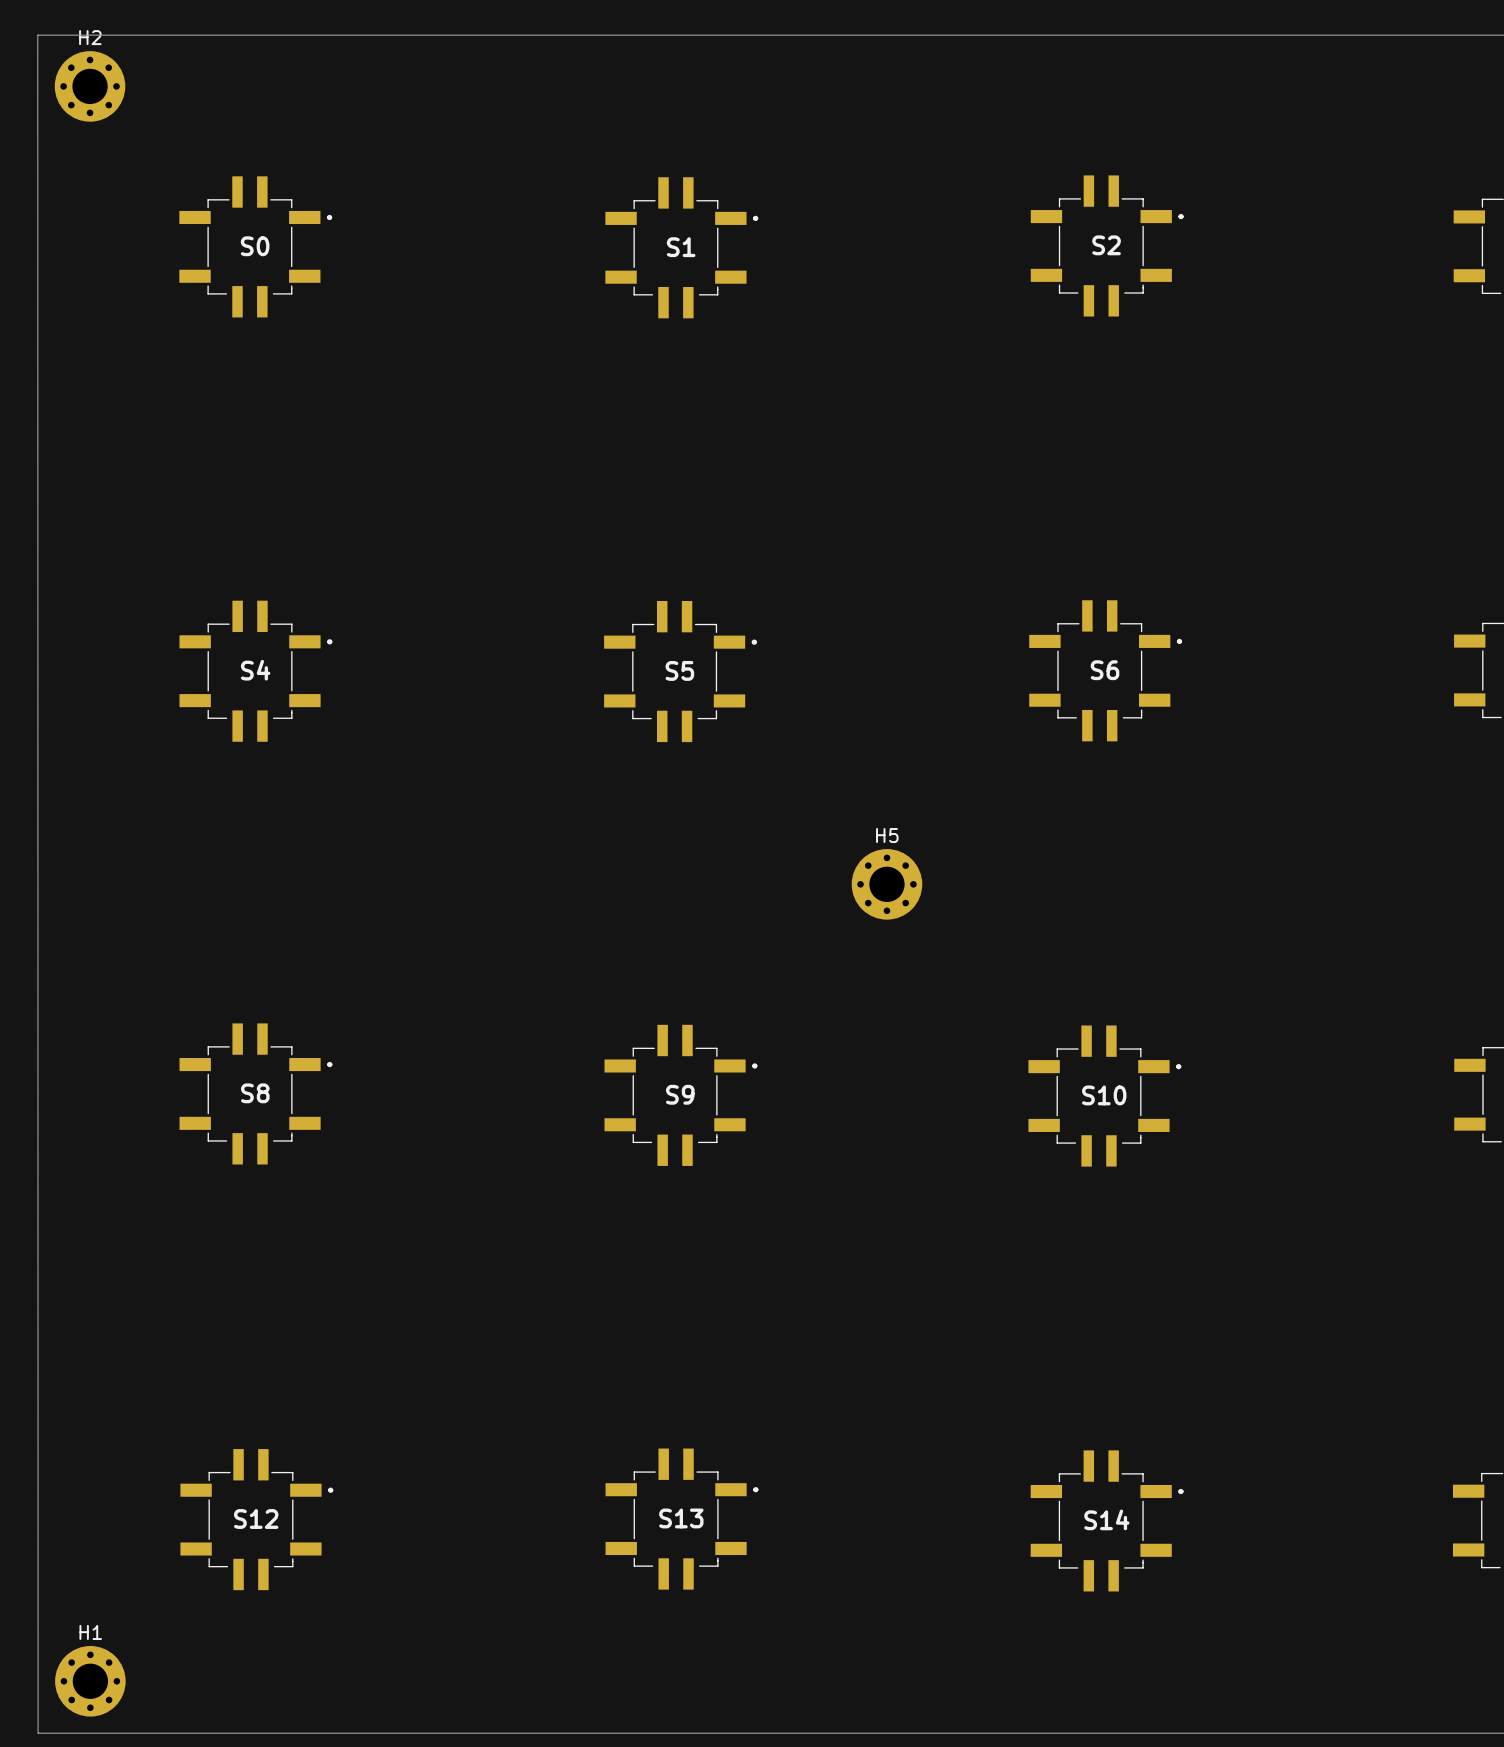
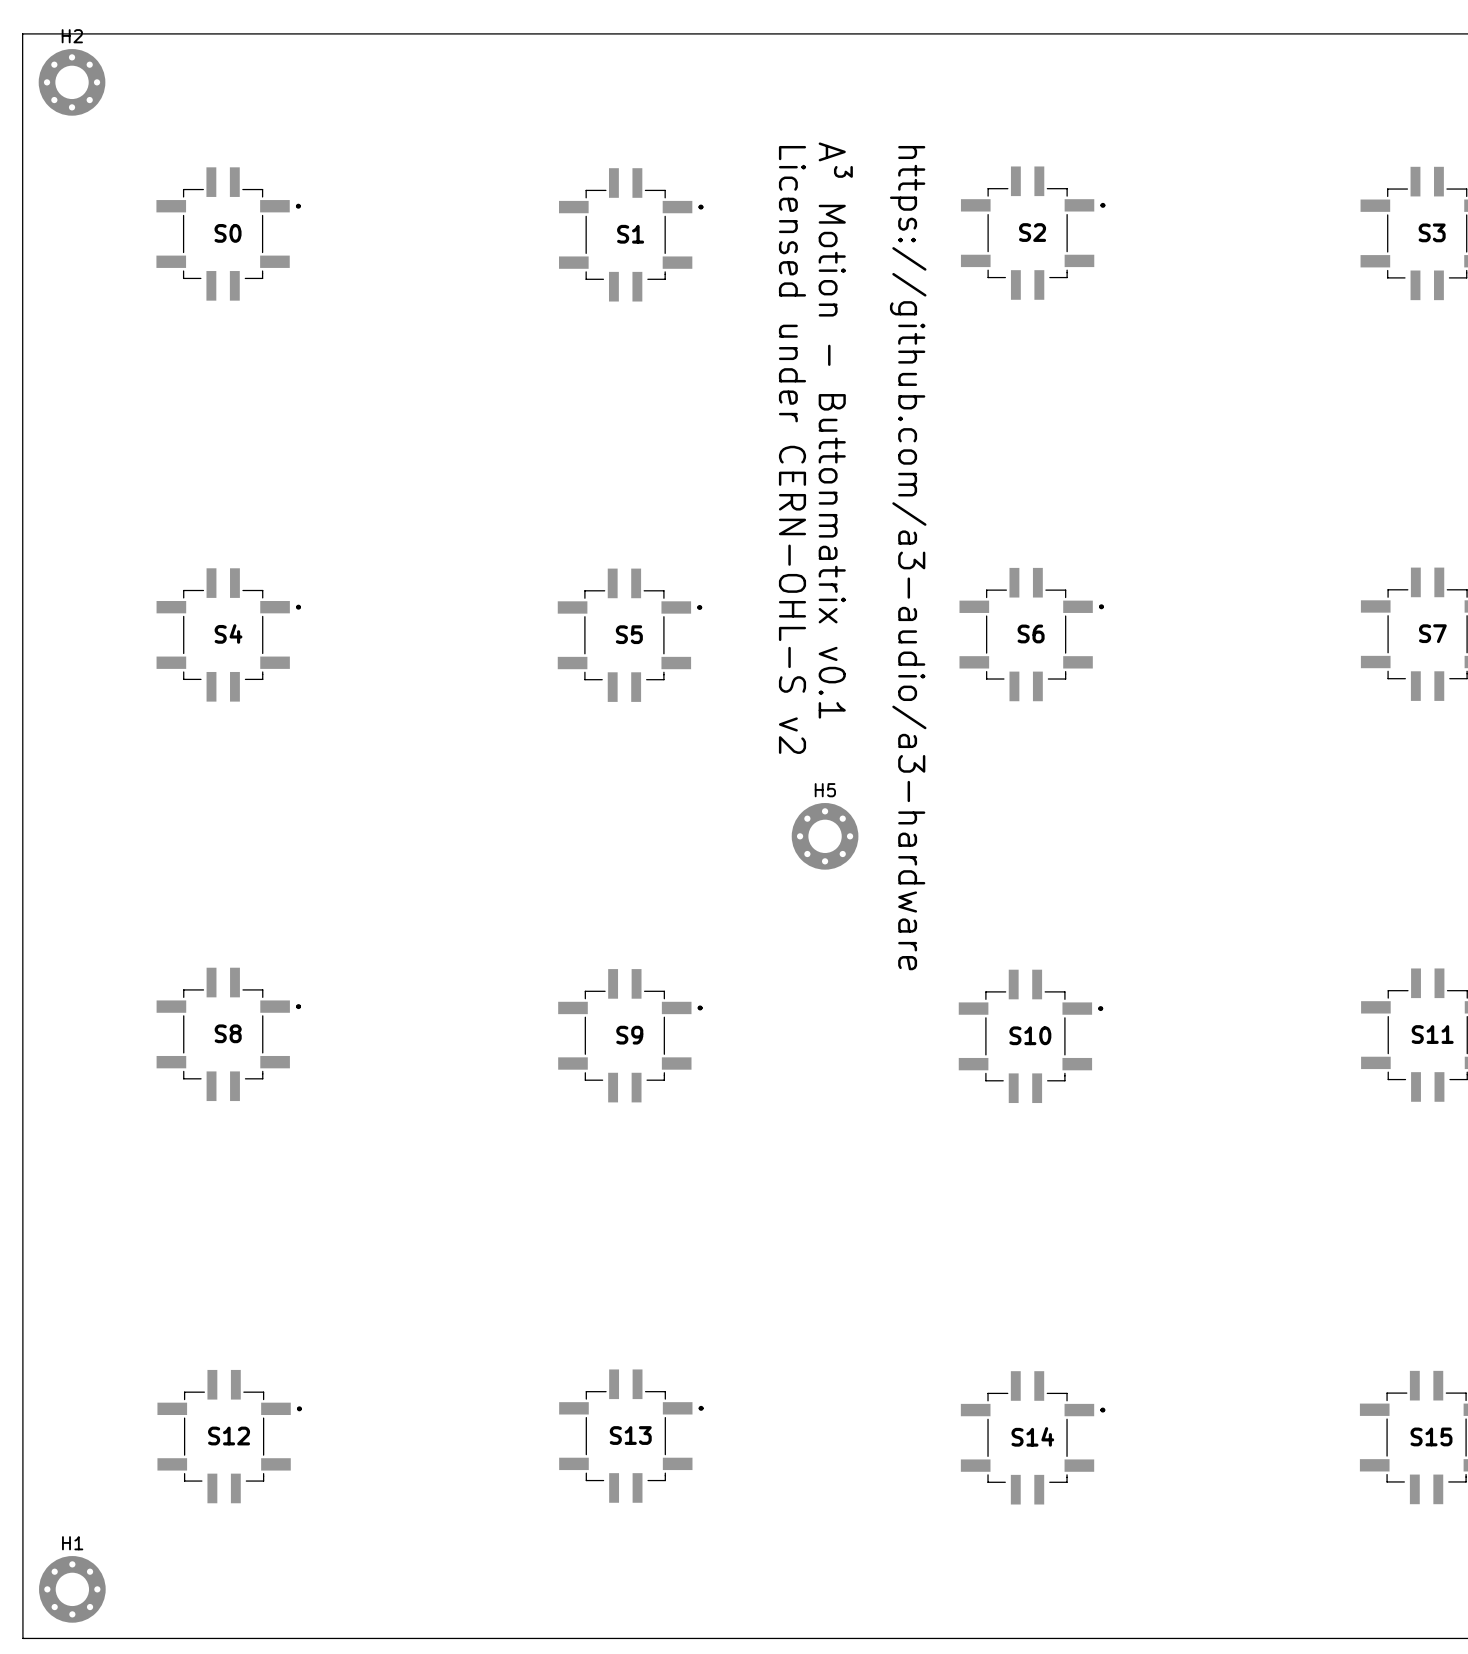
text: none -> A³ Motion - Buttonmatrix v0.1 (835, 430)
text: none -> Licensed under CERN-OHL-S v2 (792, 449)
text: none -> https://github.com/a3-audio/a3-hardware (908, 558)

